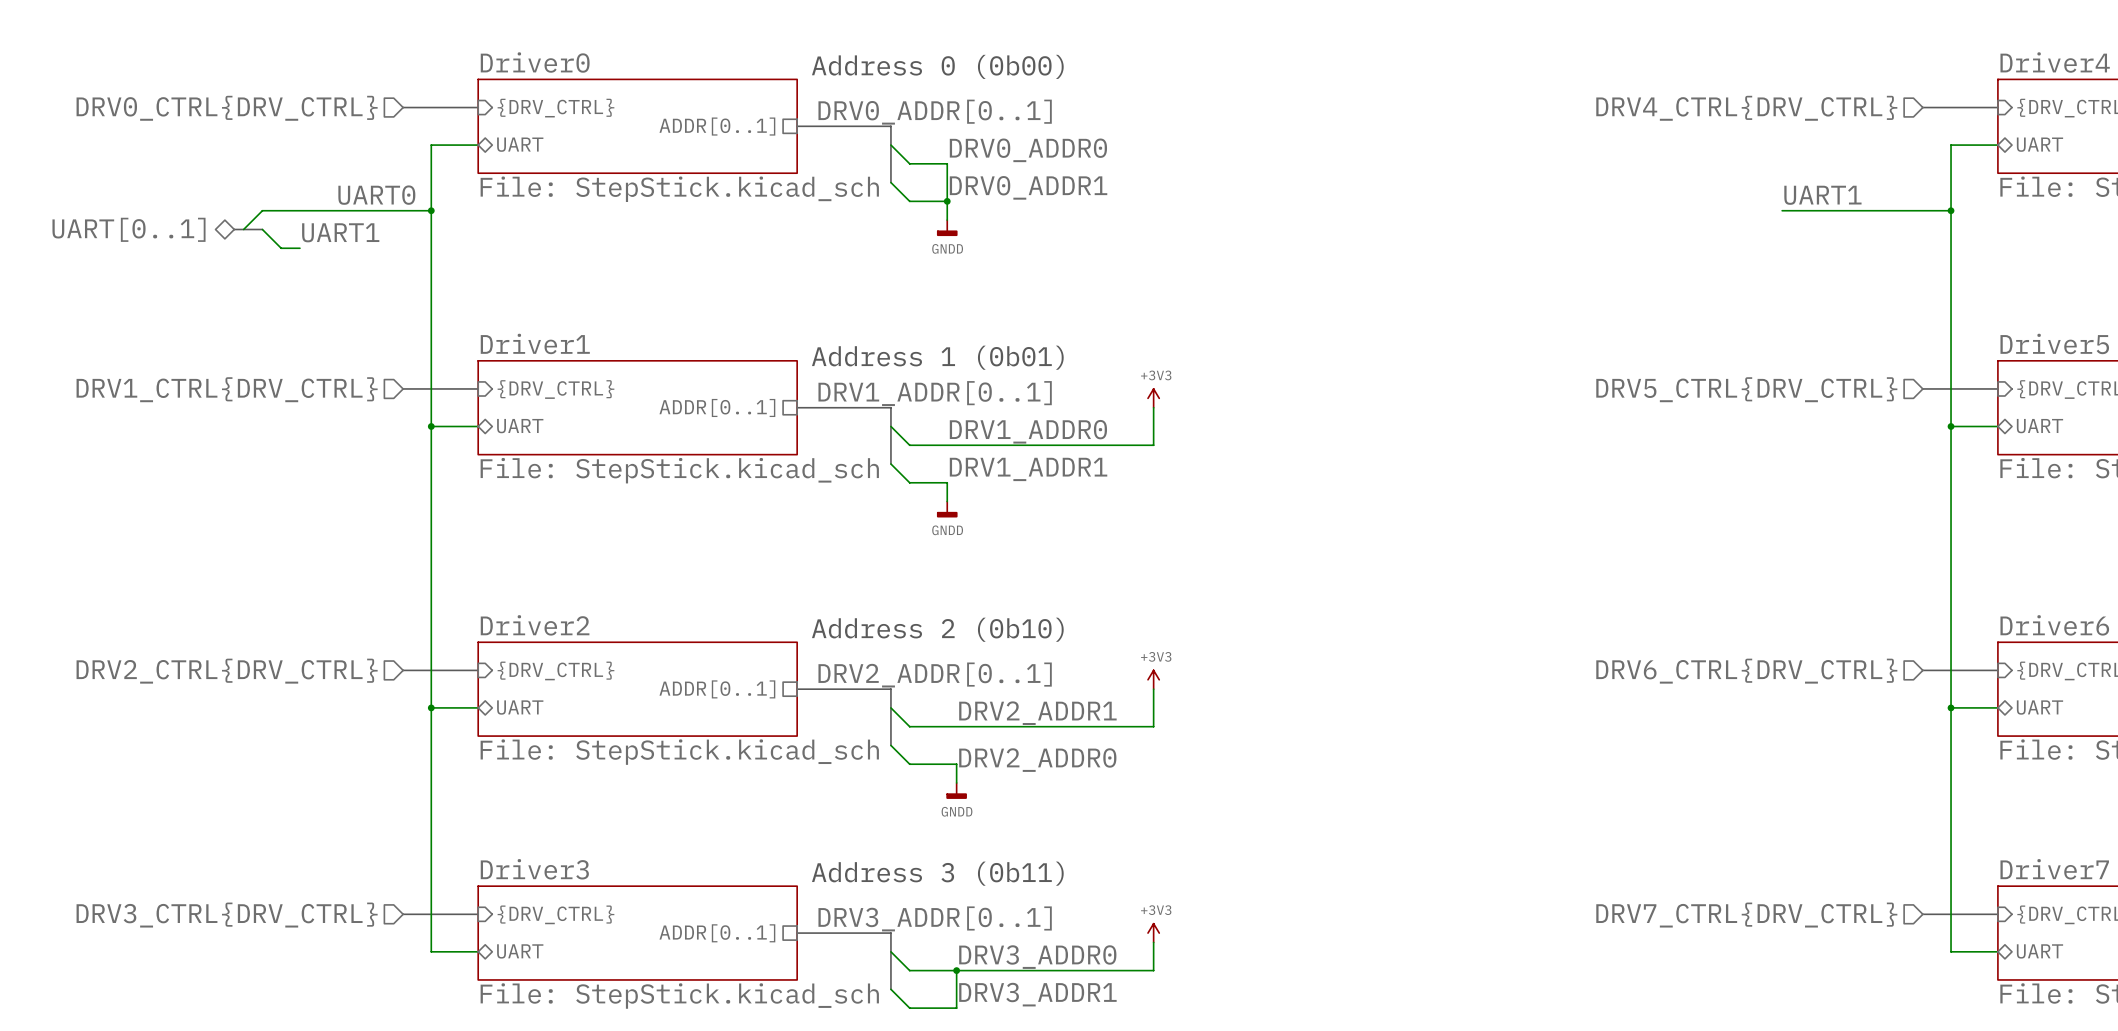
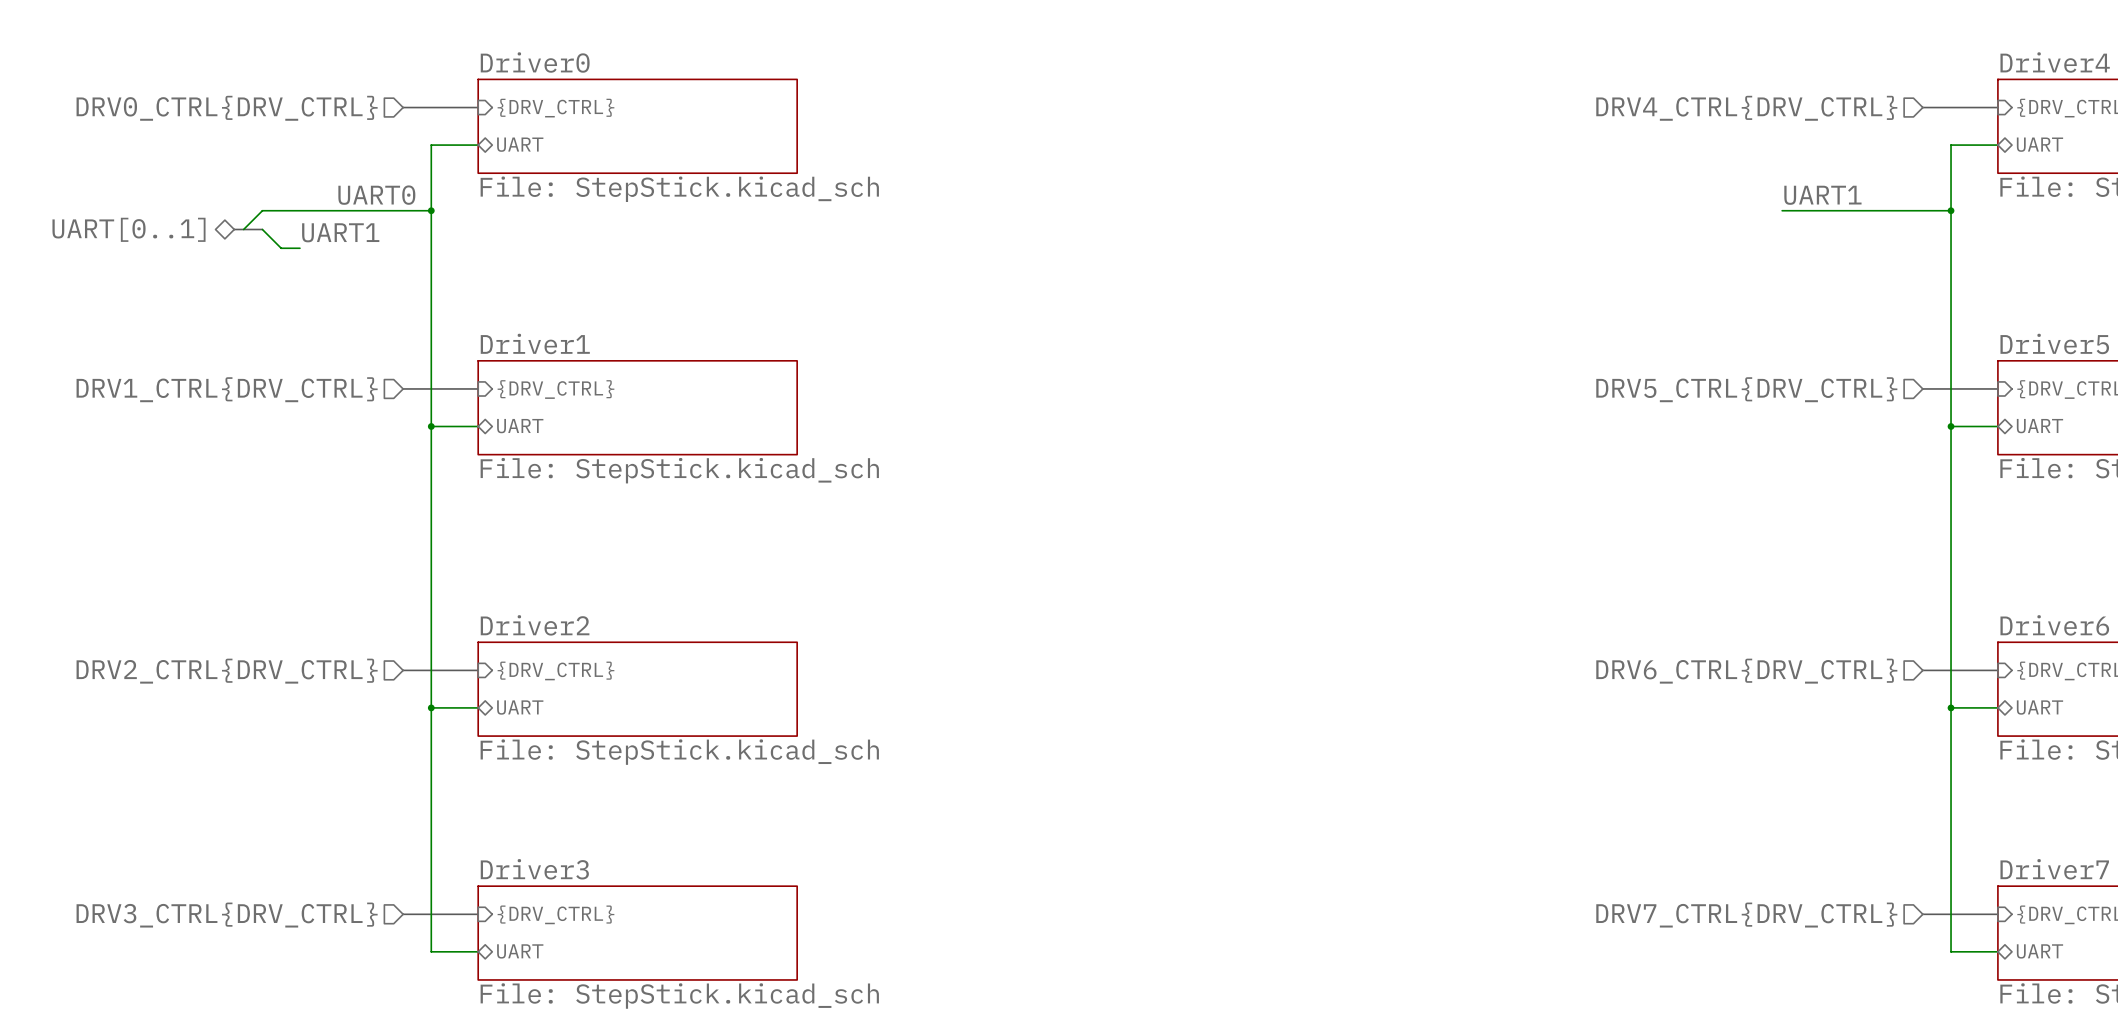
text: Address 0 (0b00) (937, 66) -> none
label: DRV0_ADDR[0..1] (935, 112) -> none
sheet pin: ADDR[0..1] (717, 126) -> none
bus: (797, 126) (890, 126) (890, 182) -> none
wire: (890, 145) (909, 163) (947, 163) (947, 220) -> none
label: DRV0_ADDR0 (1028, 150) -> none
wire: (890, 182) (909, 201) (947, 201) -> none
label: DRV0_ADDR1 (1028, 187) -> none
junction: (947, 201) -> none
power symbol: GNDD (947, 228) -> none
text: Address 1 (0b01) (937, 357) -> none
label: DRV1_ADDR[0..1] (935, 393) -> none
power symbol: +3V3 (1153, 398) -> none
sheet pin: ADDR[0..1] (717, 407) -> none
bus: (797, 407) (890, 407) (890, 464) -> none
wire: (1153, 407) (1153, 445) (909, 445) (890, 426) -> none
label: DRV1_ADDR0 (1028, 431) -> none
wire: (890, 464) (909, 482) (947, 482) (947, 501) -> none
label: DRV1_ADDR1 (1028, 469) -> none
power symbol: GNDD (947, 509) -> none
text: Address 2 (0b10) (937, 629) -> none
label: DRV2_ADDR[0..1] (935, 674) -> none
power symbol: +3V3 (1153, 679) -> none
sheet pin: ADDR[0..1] (717, 689) -> none
bus: (797, 689) (890, 689) (890, 745) -> none
wire: (1153, 689) (1153, 726) (909, 726) (890, 707) -> none
label: DRV2_ADDR1 (1037, 713) -> none
wire: (890, 745) (909, 764) (956, 764) (956, 782) -> none
label: DRV2_ADDR0 (1037, 760) -> none
power symbol: GNDD (956, 790) -> none
text: Address 3 (0b11) (937, 873) -> none
label: DRV3_ADDR[0..1] (935, 918) -> none
sheet pin: ADDR[0..1] (717, 933) -> none
bus: (797, 933) (890, 933) (890, 989) -> none
power symbol: +3V3 (1153, 933) -> none
wire: (1153, 942) (1153, 970) (909, 970) (890, 951) -> none
label: DRV3_ADDR0 (1037, 957) -> none
wire: (956, 970) (956, 1008) (909, 1008) (890, 989) -> none
junction: (956, 970) -> none
label: DRV3_ADDR1 (1037, 994) -> none

